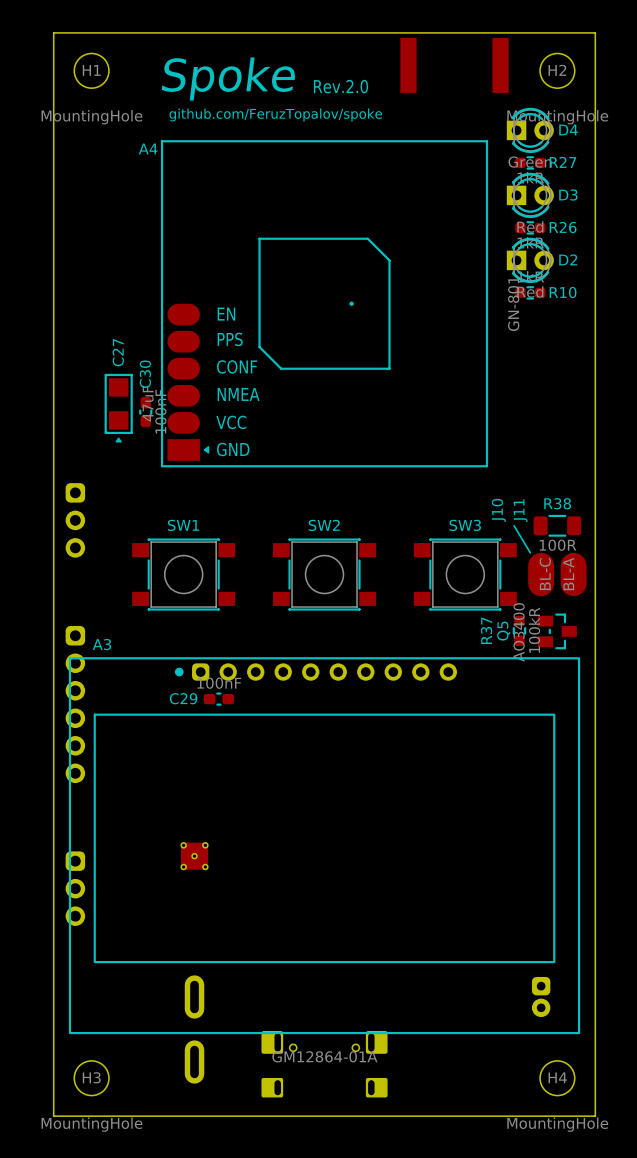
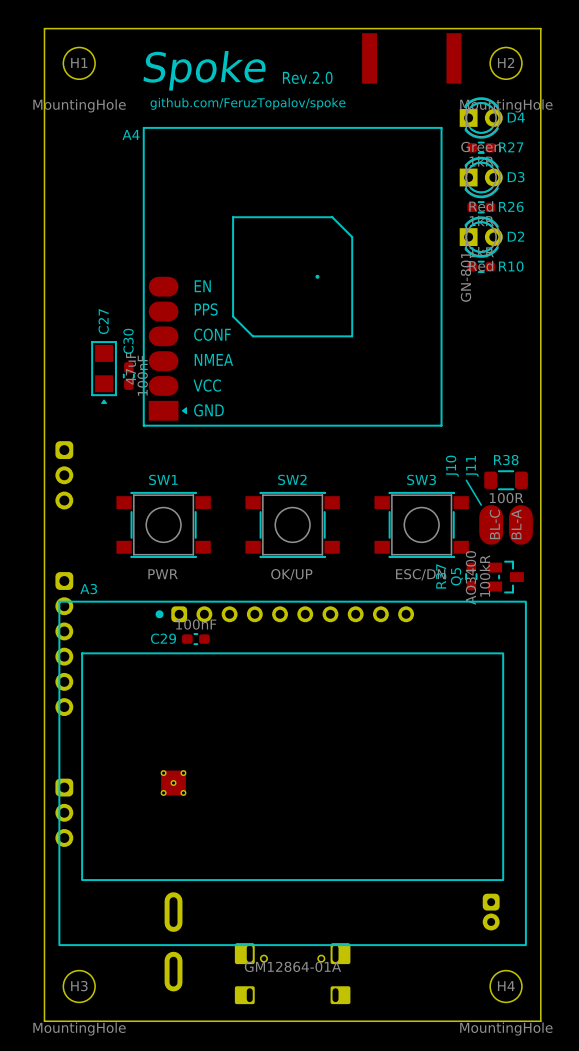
SW1 value: none -> PWR (163, 574)
SW2 value: none -> OK/UP (291, 574)
SW3 value: none -> ESC/DN (420, 574)

